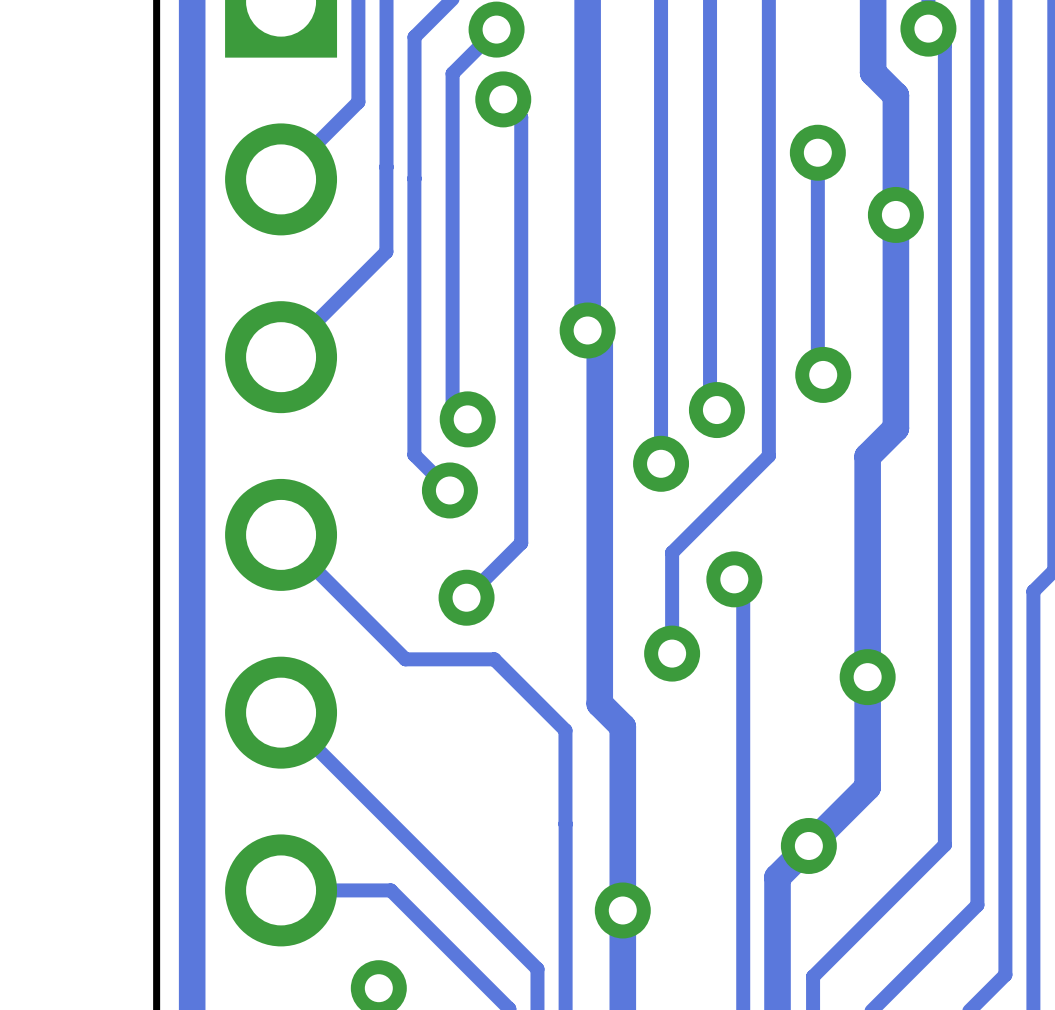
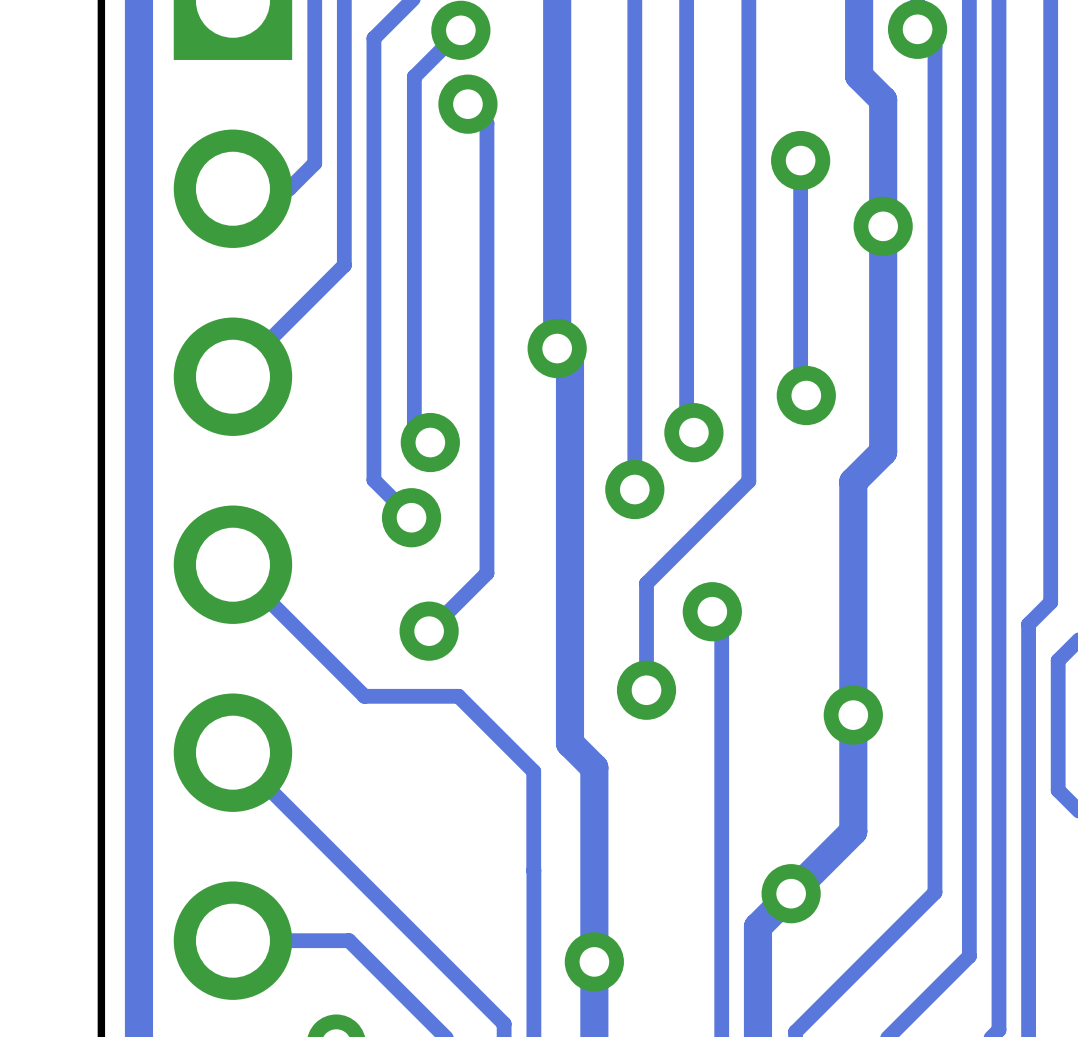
track: (358, 102) (281, 179) -> (314, 106) (314, 163) (289, 188) (232, 188)

